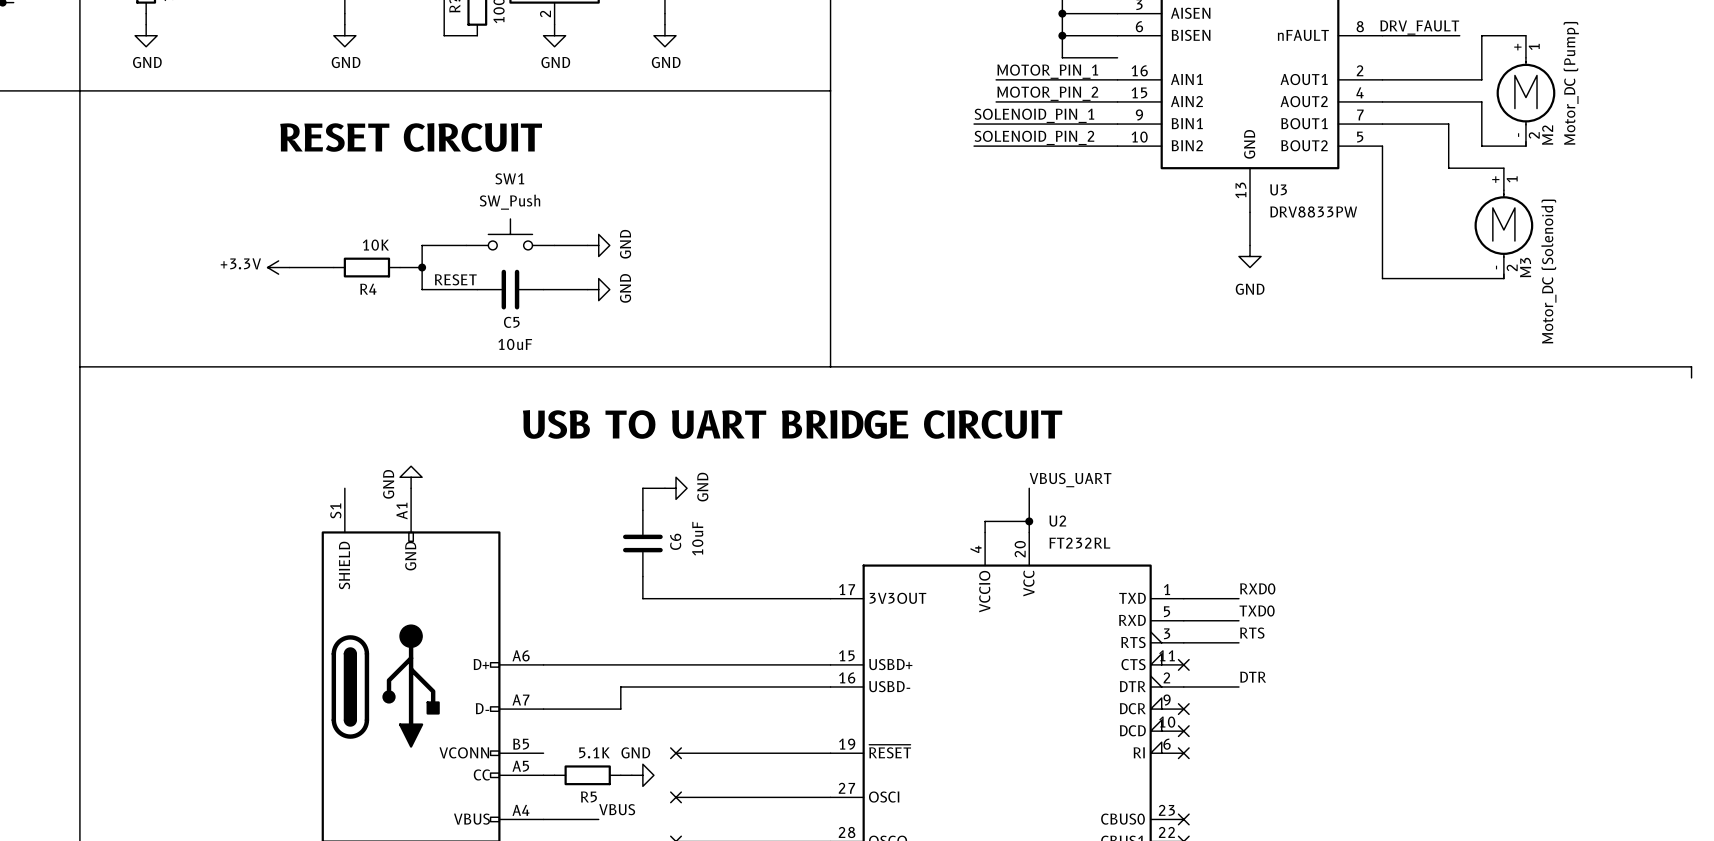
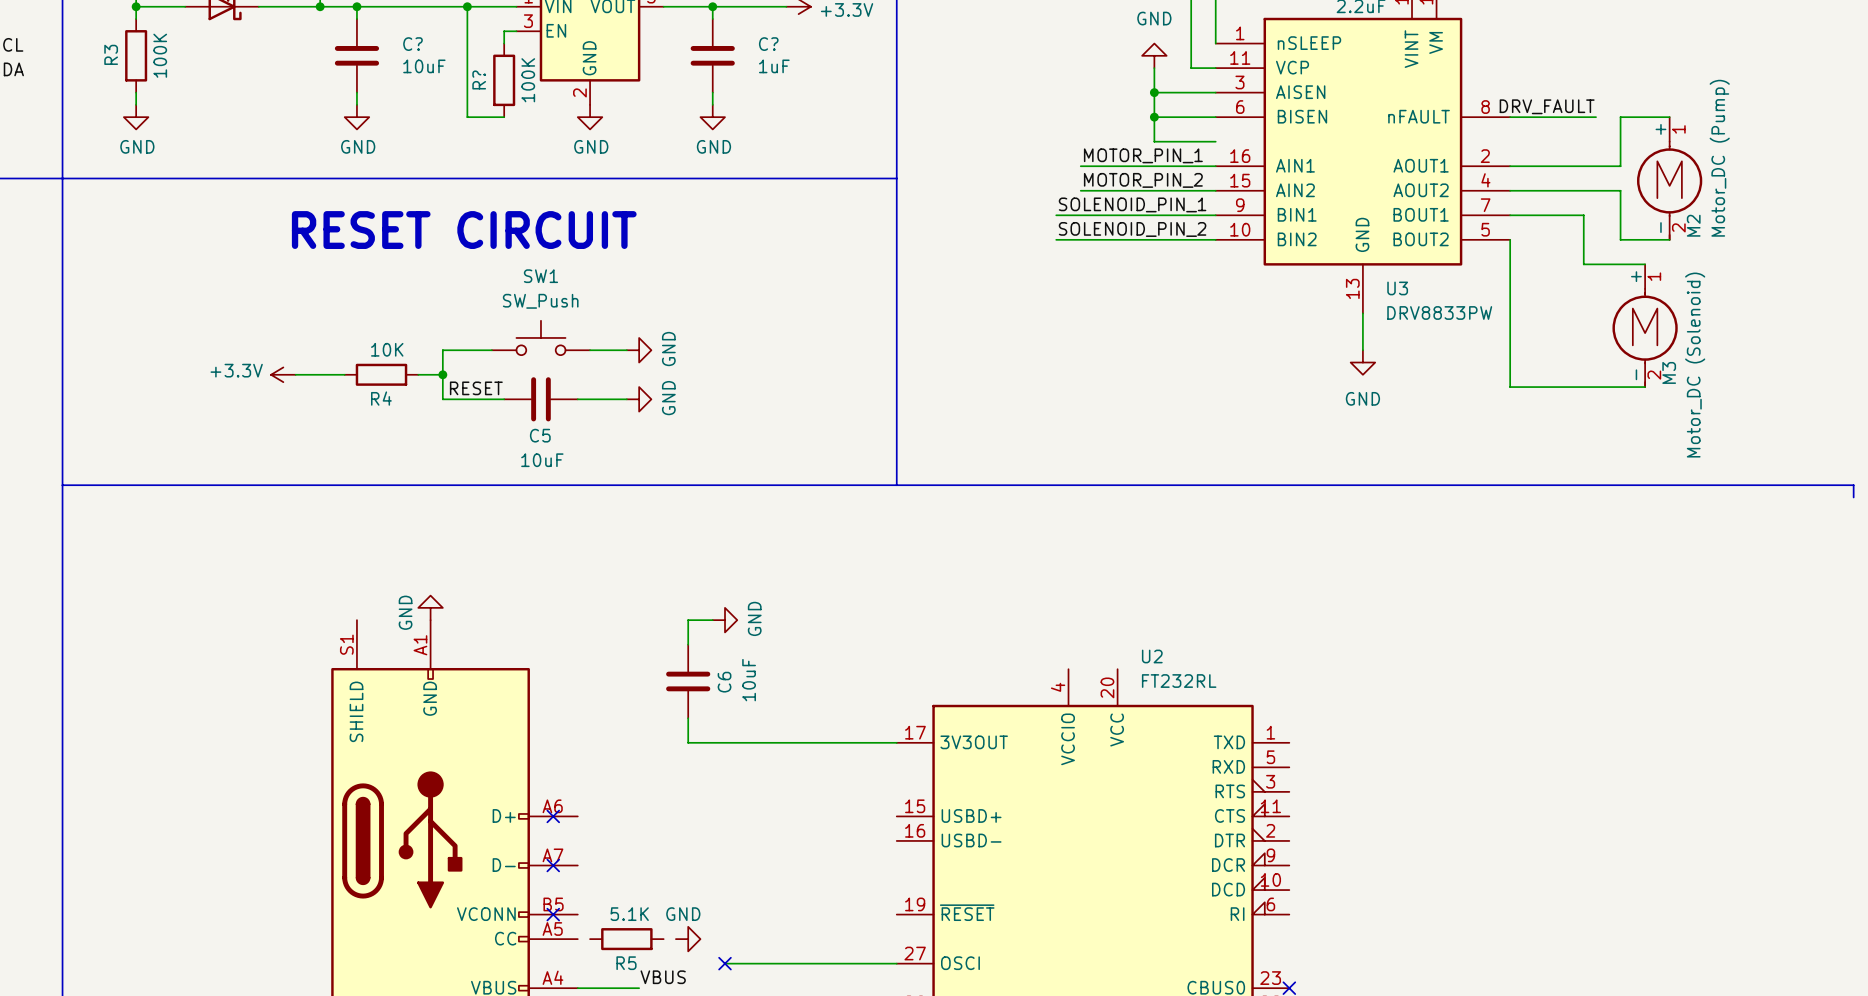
text: USB TO UART BRIDGE CIRCUIT (792, 424) -> none
label: VBUS_UART (1070, 480) -> none
wire: (1029, 488) (1029, 532) -> none
wire: (1029, 521) (985, 521) (985, 532) -> none
junction: (1029, 521) -> none
label: RXD0 (1257, 588) -> none
wire: (1183, 598) (1238, 598) -> none
label: TXD0 (1257, 610) -> none
wire: (1183, 620) (1238, 620) -> none
label: RTS (1252, 633) -> none
wire: (1183, 642) (1238, 642) -> none
no-connect mark: none -> (553, 816)
wire: (543, 664) (830, 664) -> none
no-connect mark: (1183, 664) -> none
label: DTR (1253, 677) -> none
wire: (830, 686) (620, 686) (620, 709) (543, 709) -> none
wire: (1183, 686) (1238, 686) -> none
no-connect mark: none -> (553, 865)
no-connect mark: (1183, 709) -> none
no-connect mark: (1183, 731) -> none
no-connect mark: none -> (553, 914)
wire: (676, 753) (830, 753) -> none
no-connect mark: (676, 753) -> none
no-connect mark: (1183, 753) -> none
wire: (543, 775) (554, 775) -> none
wire: (620, 775) (631, 775) -> none

